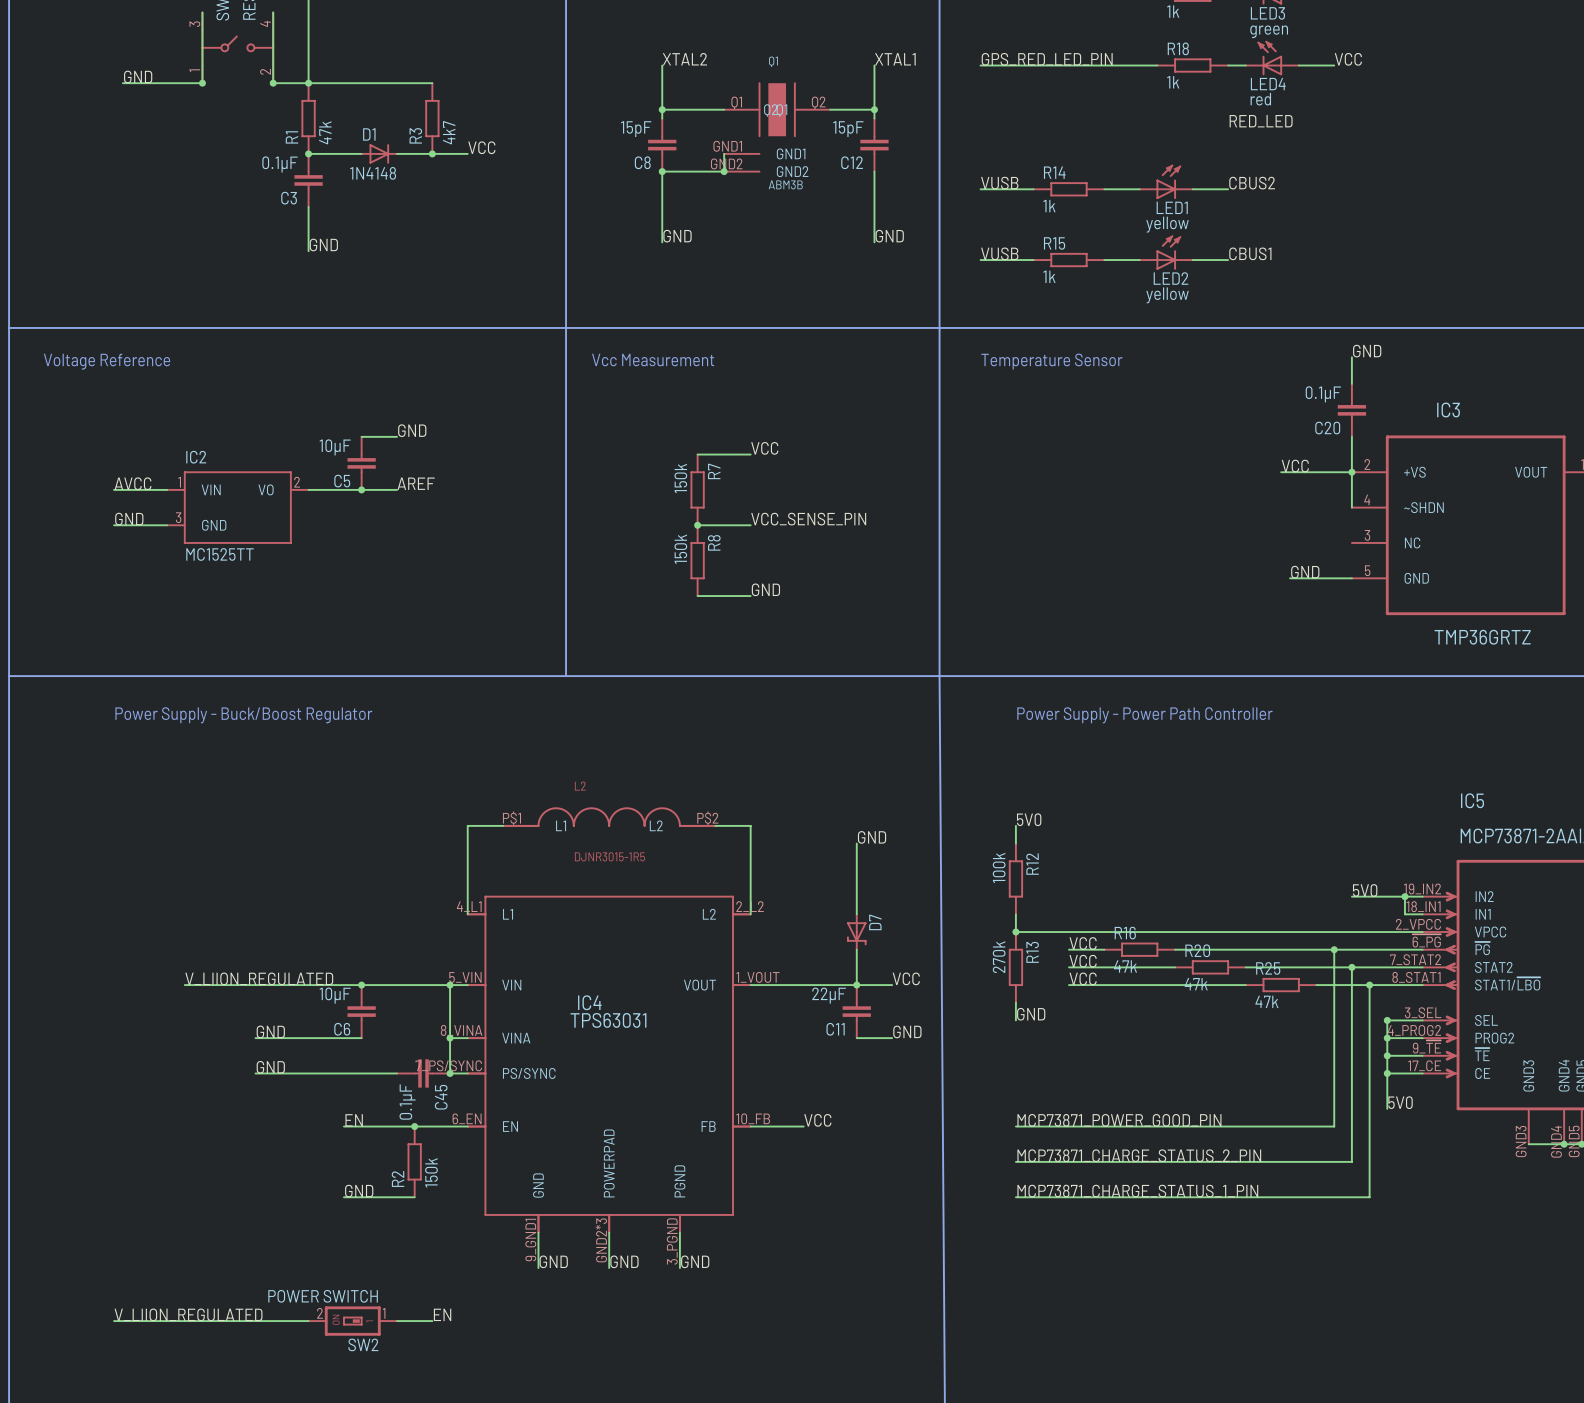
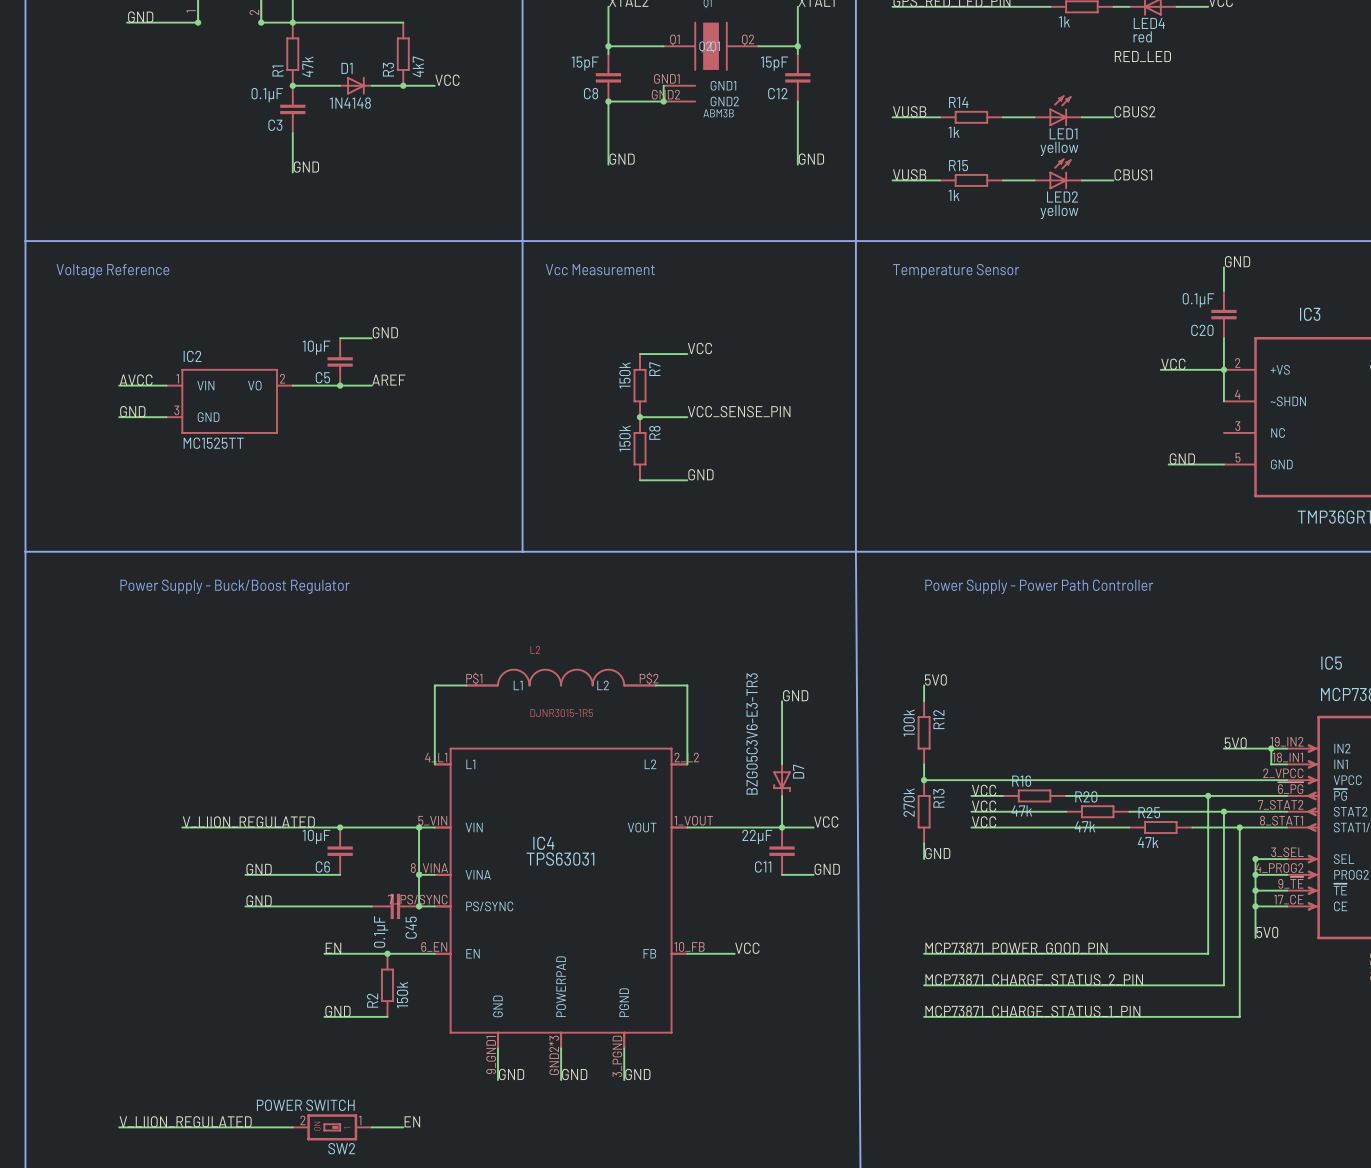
D7 value: none -> BZG05C3V6-E3-TR3 (752, 733)

